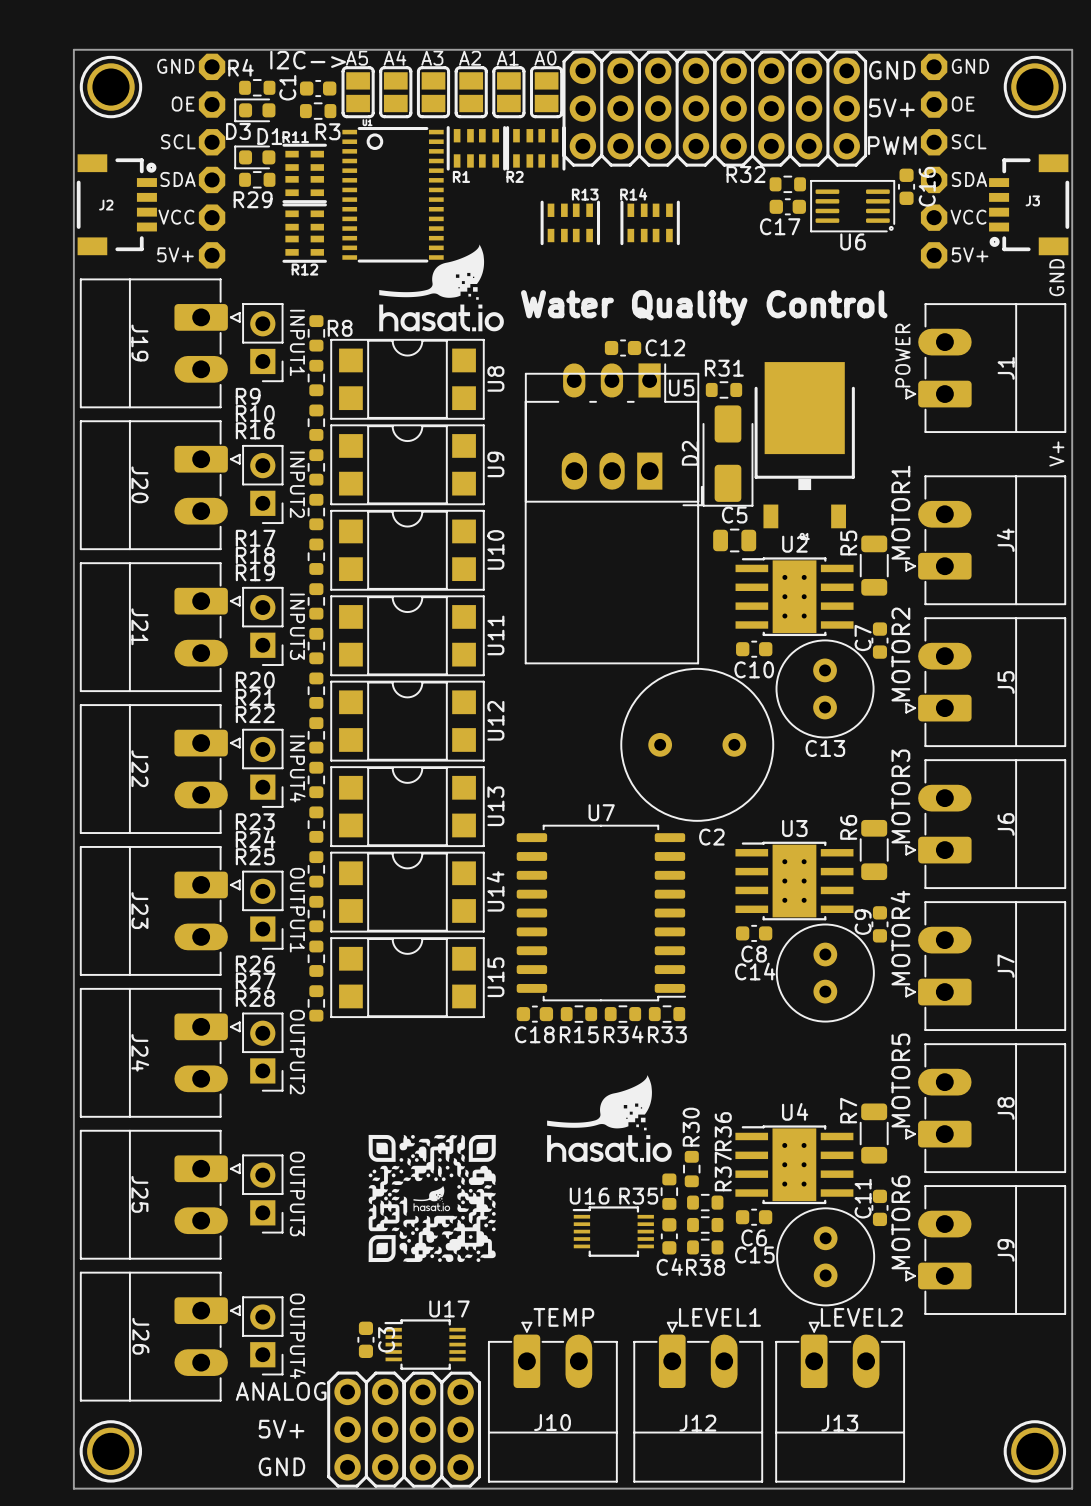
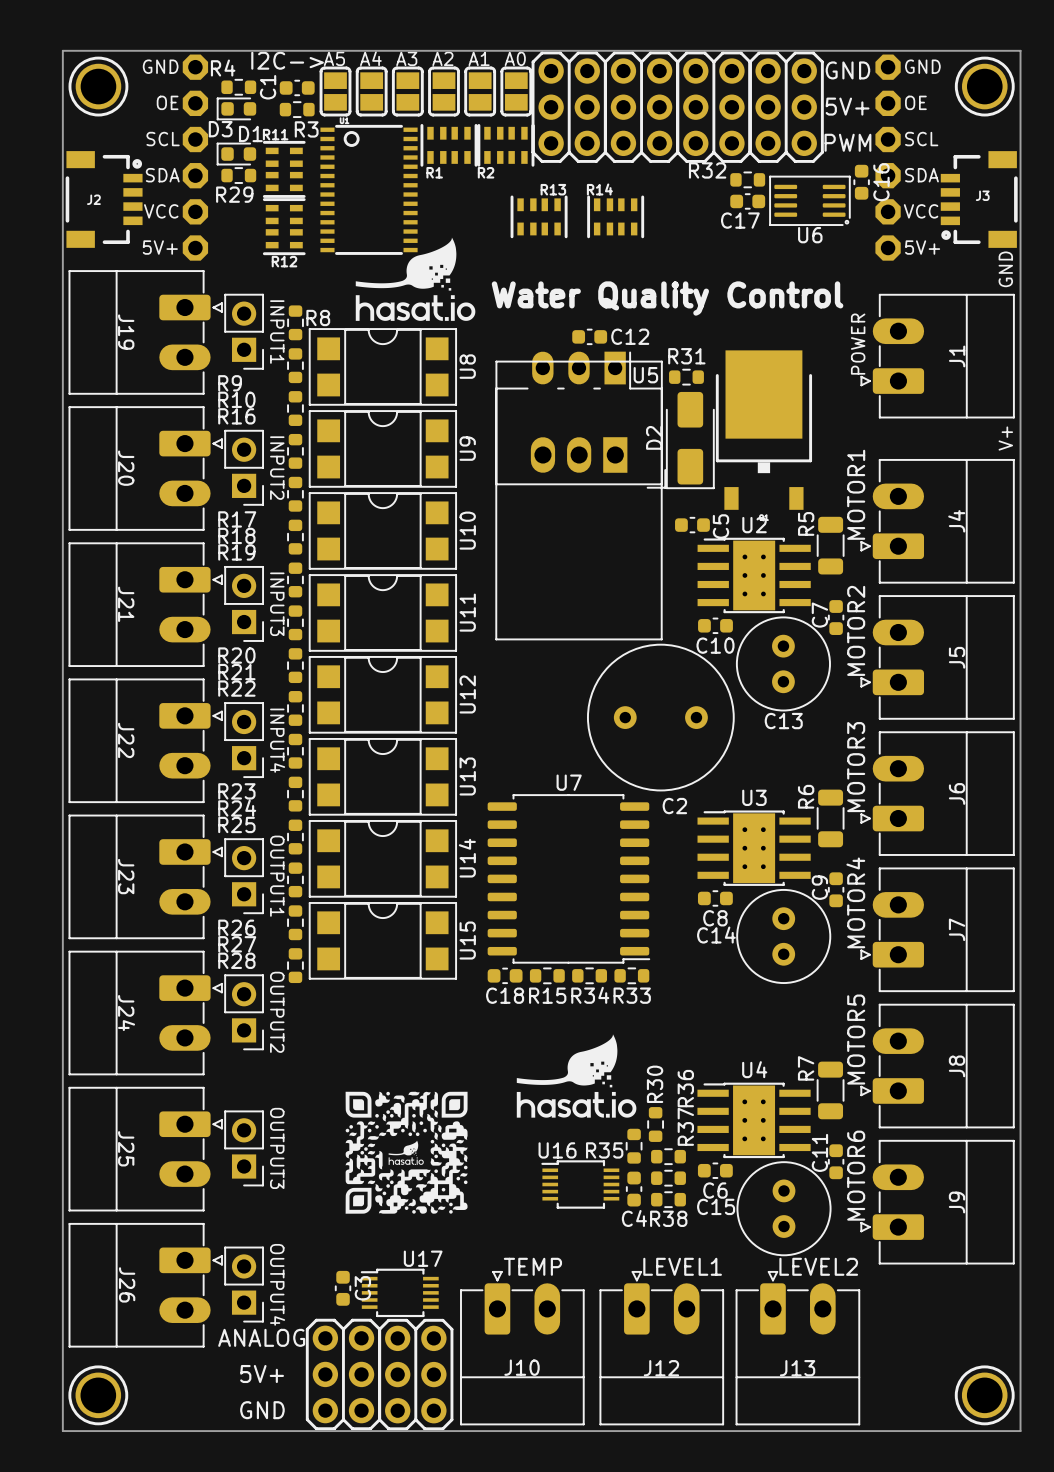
C5 name rotation: 0° (734, 514) -> 90° counterclockwise (720, 526)
C5 name position: C5 (734, 514) -> C5 (720, 526)
C5 footprint: [713, 528, 757, 553] -> [675, 516, 710, 534]

